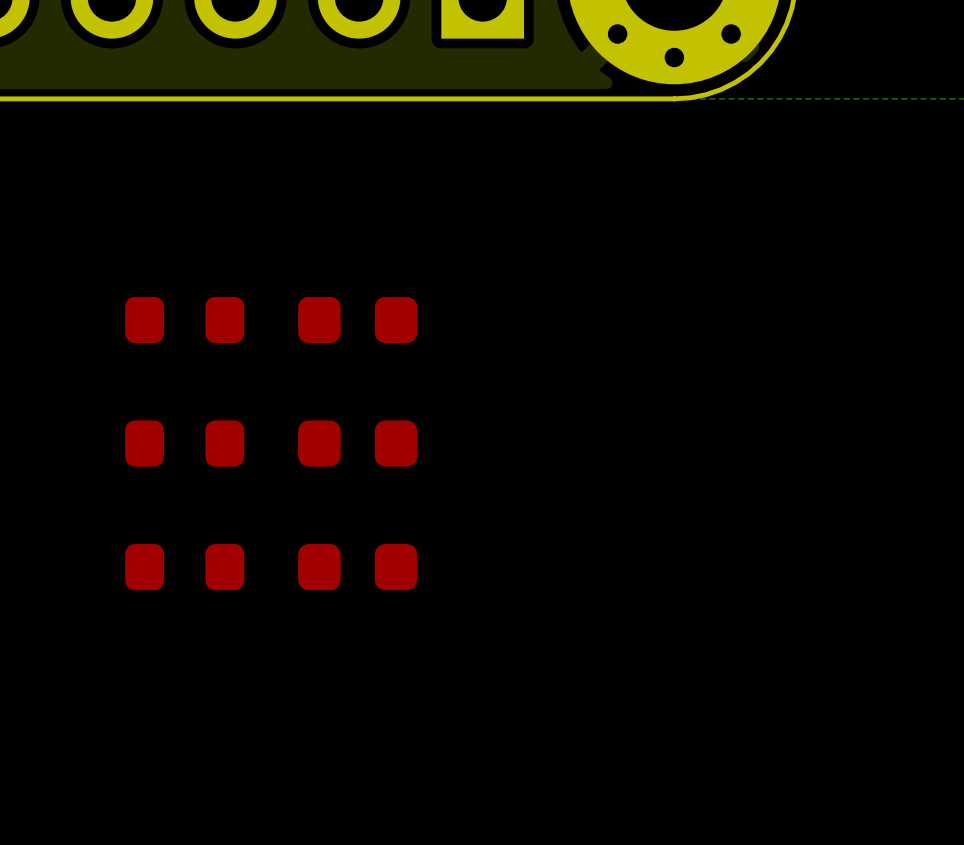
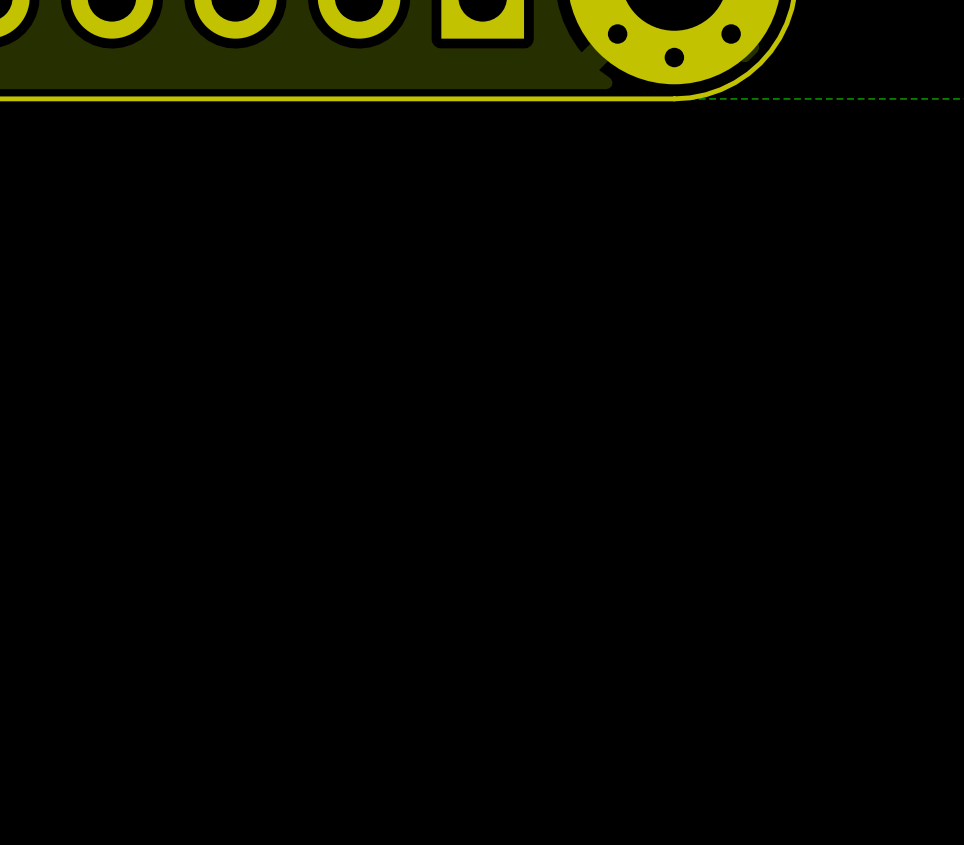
part: (184, 319) -> none
part: (357, 319) -> none
part: (184, 443) -> none
part: (357, 443) -> none
part: (184, 567) -> none
part: (357, 567) -> none

